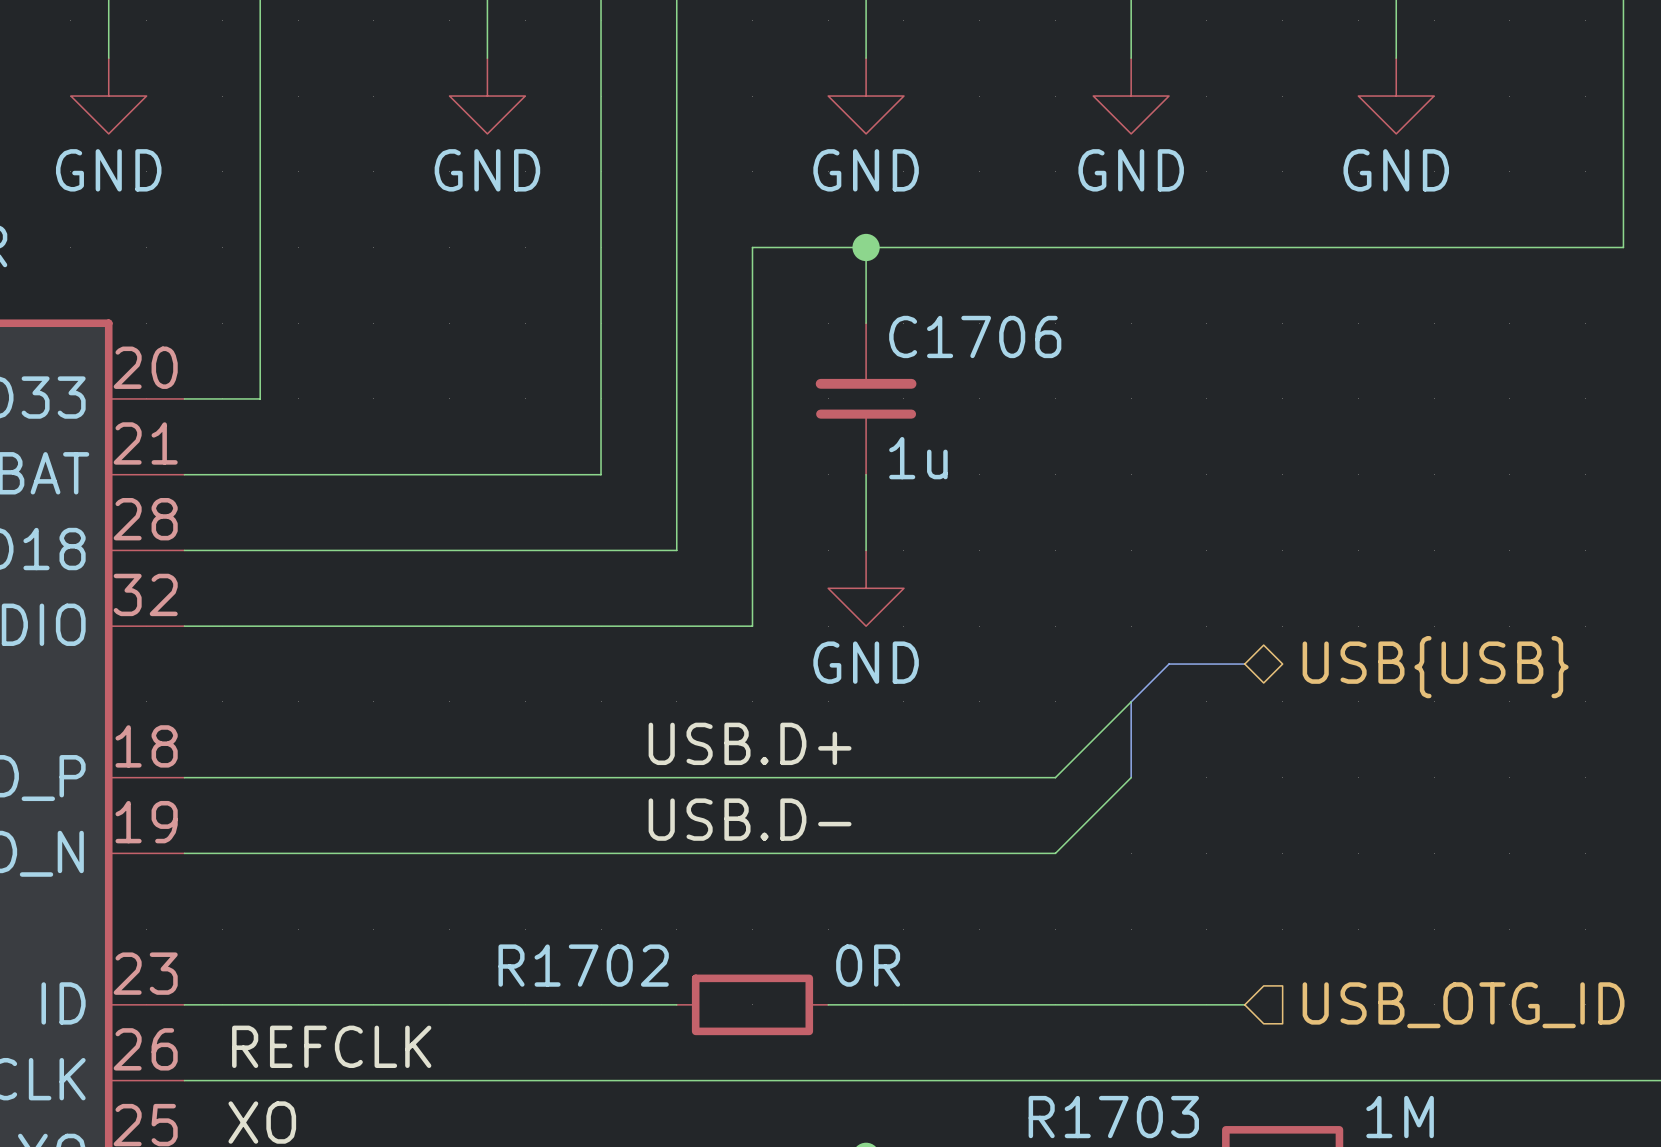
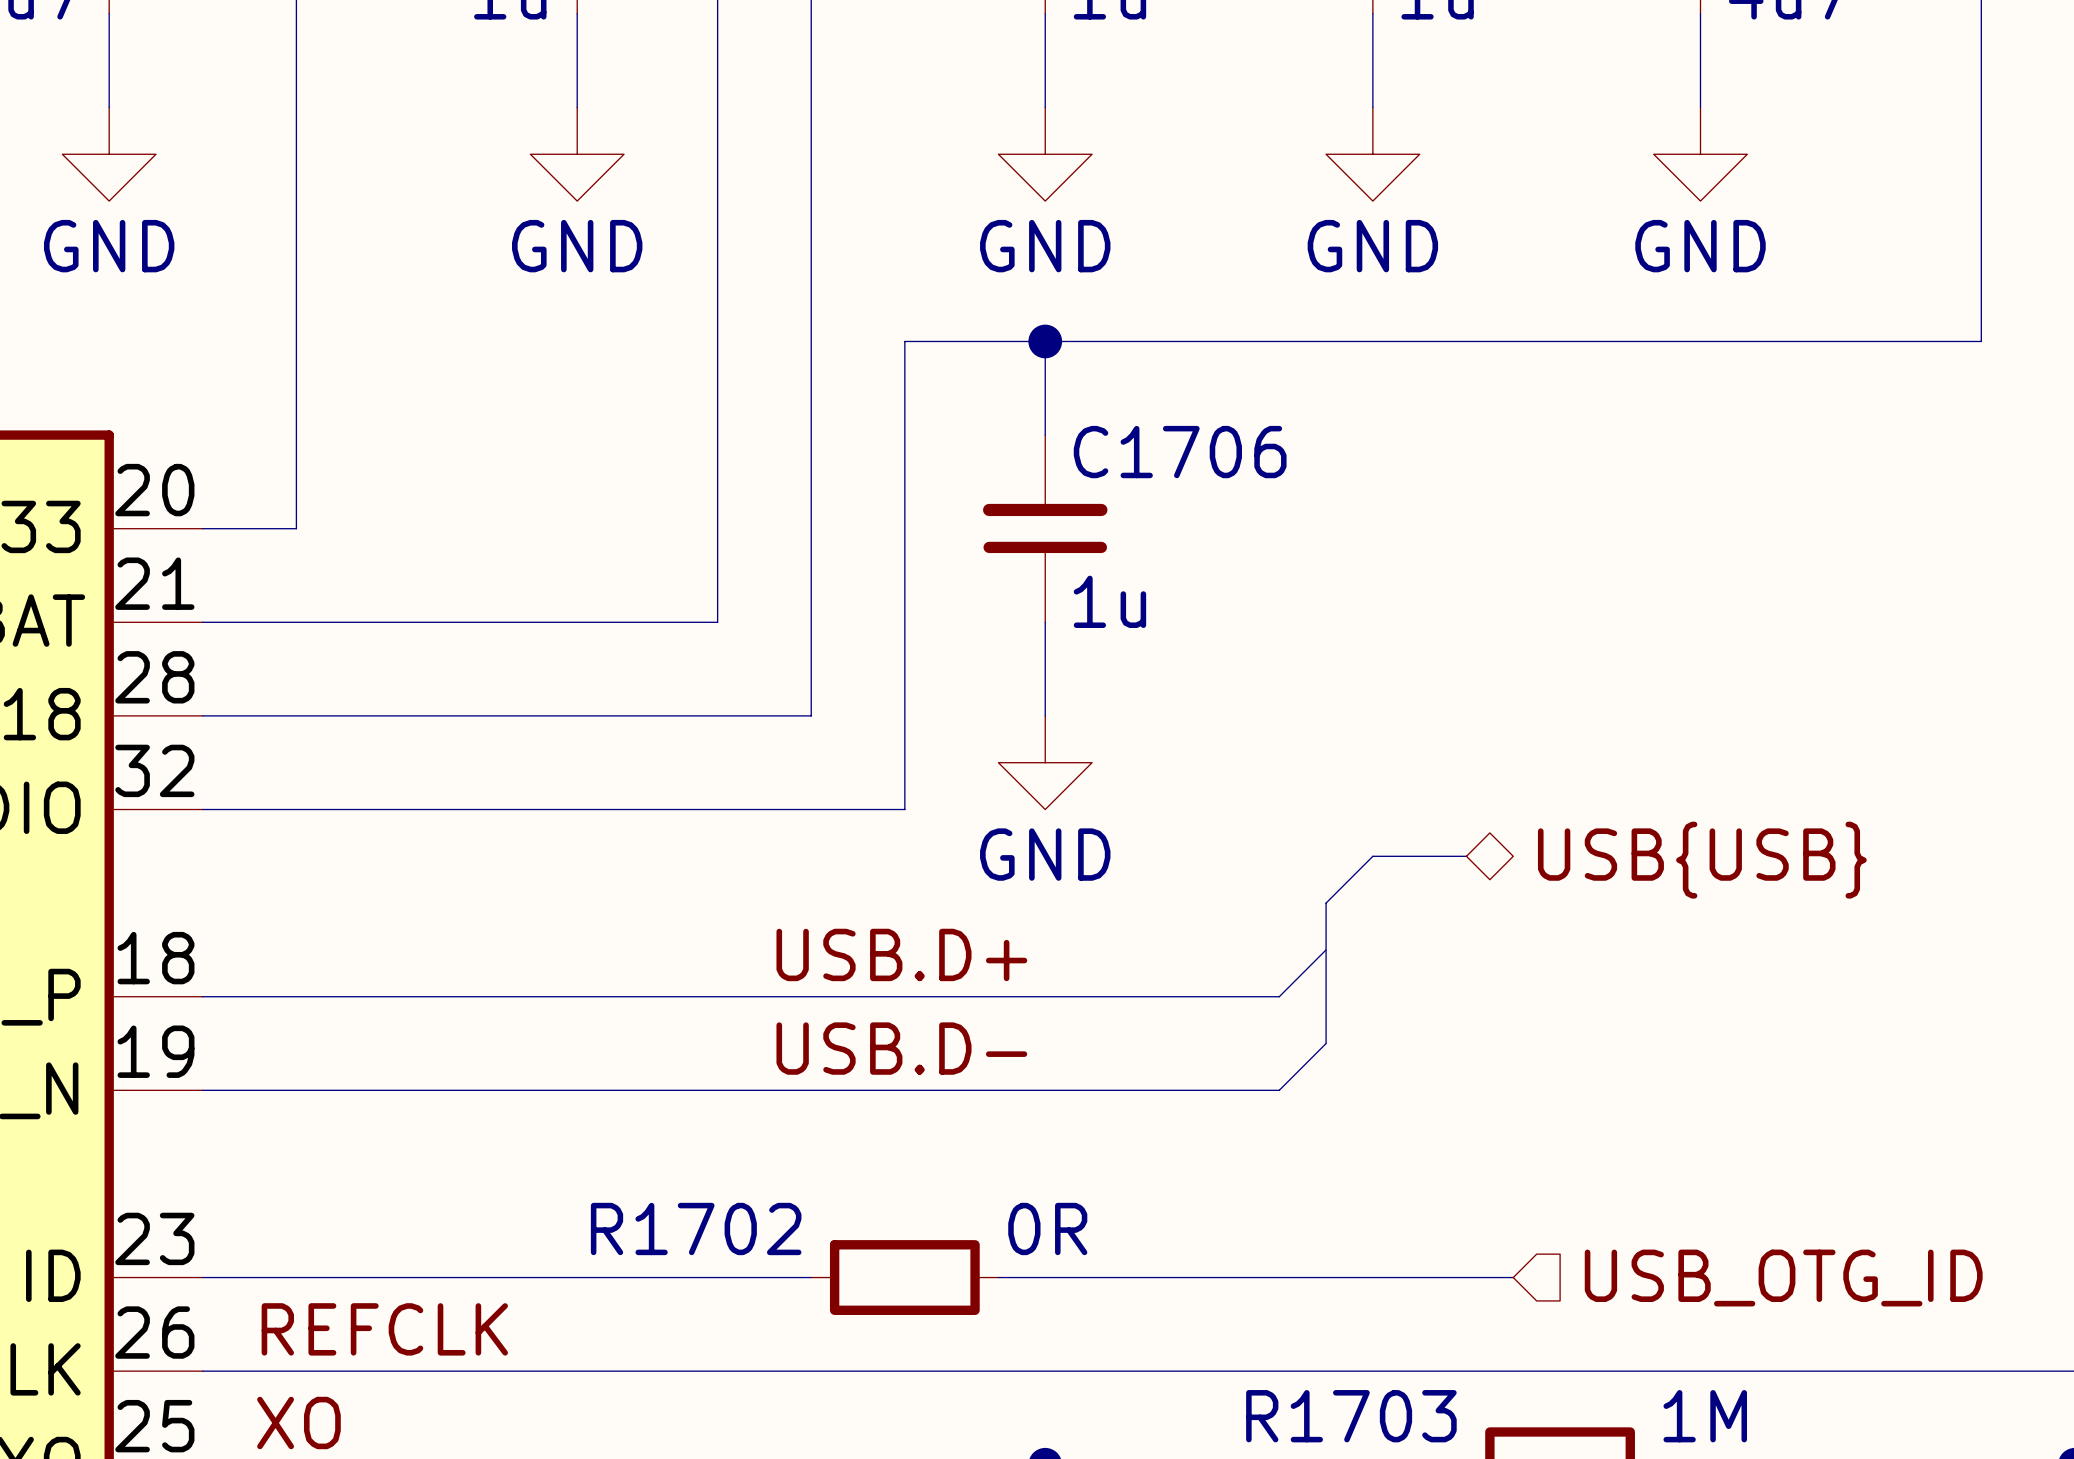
bus: (1169, 664) (1131, 701) (1131, 777) -> (1419, 856) (1372, 856) (1326, 903) (1326, 1043)
bus: (1206, 664) (1244, 664) -> none
hierarchical label position: USB{USB} (1435, 667) -> USB{USB} (1702, 860)
wire: (1131, 701) (1093, 739) -> none
wire: (1131, 777) (1093, 815) -> none

